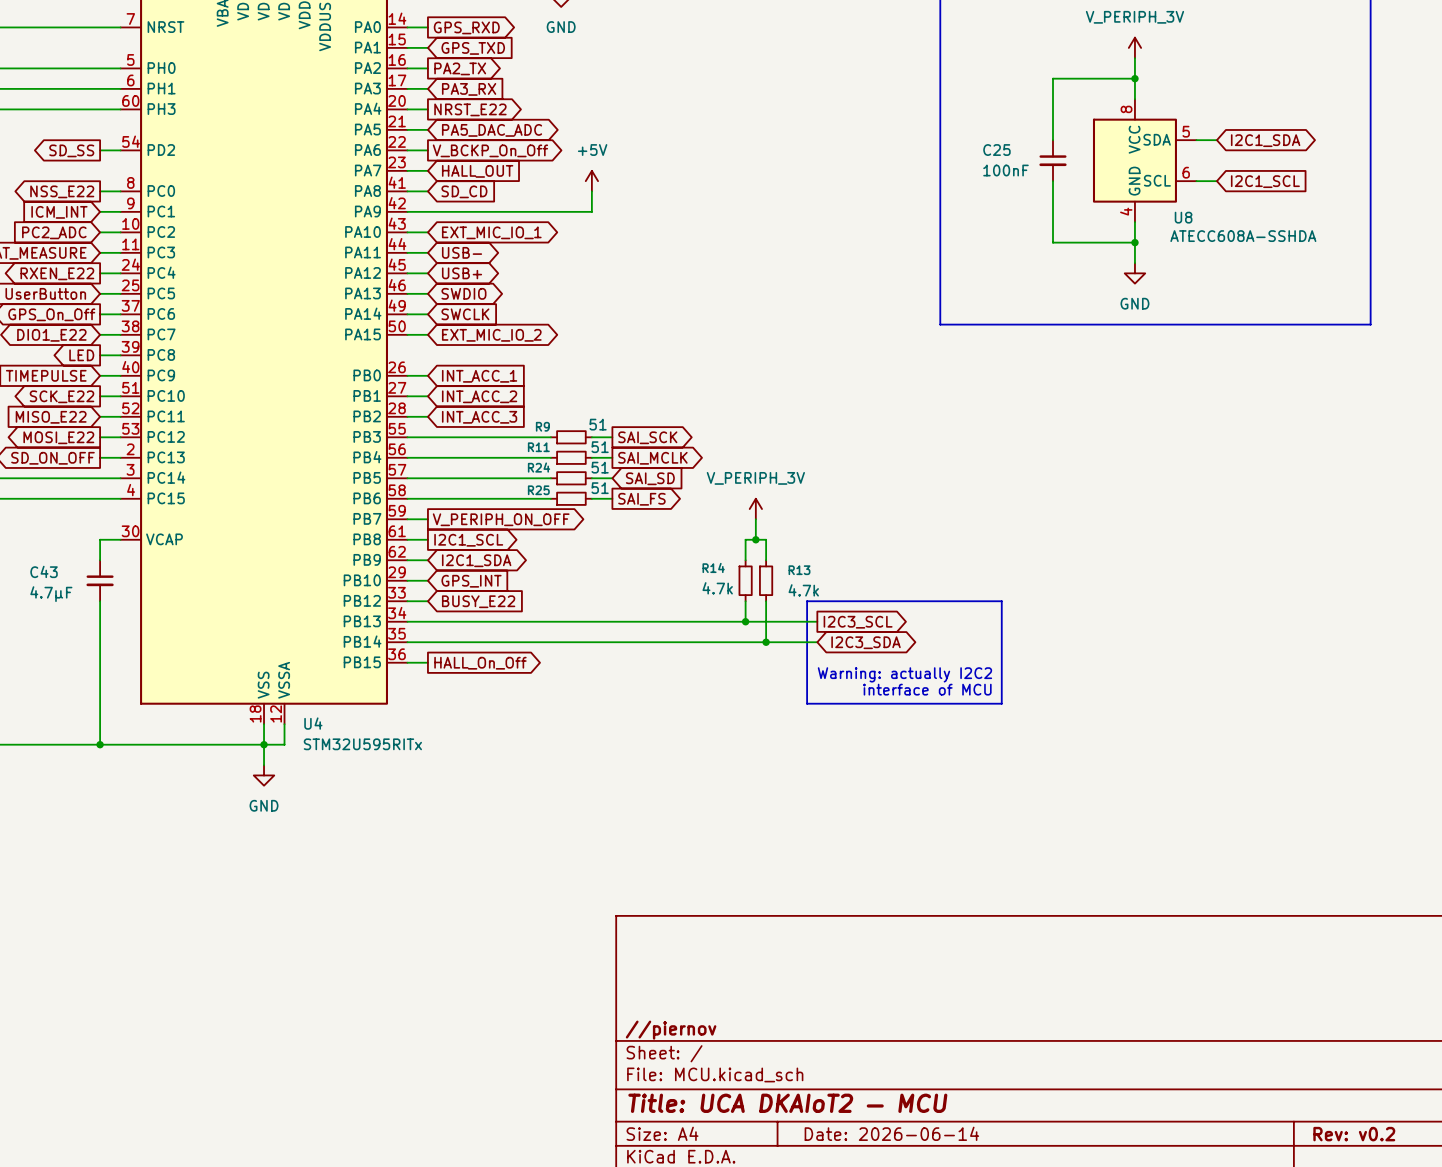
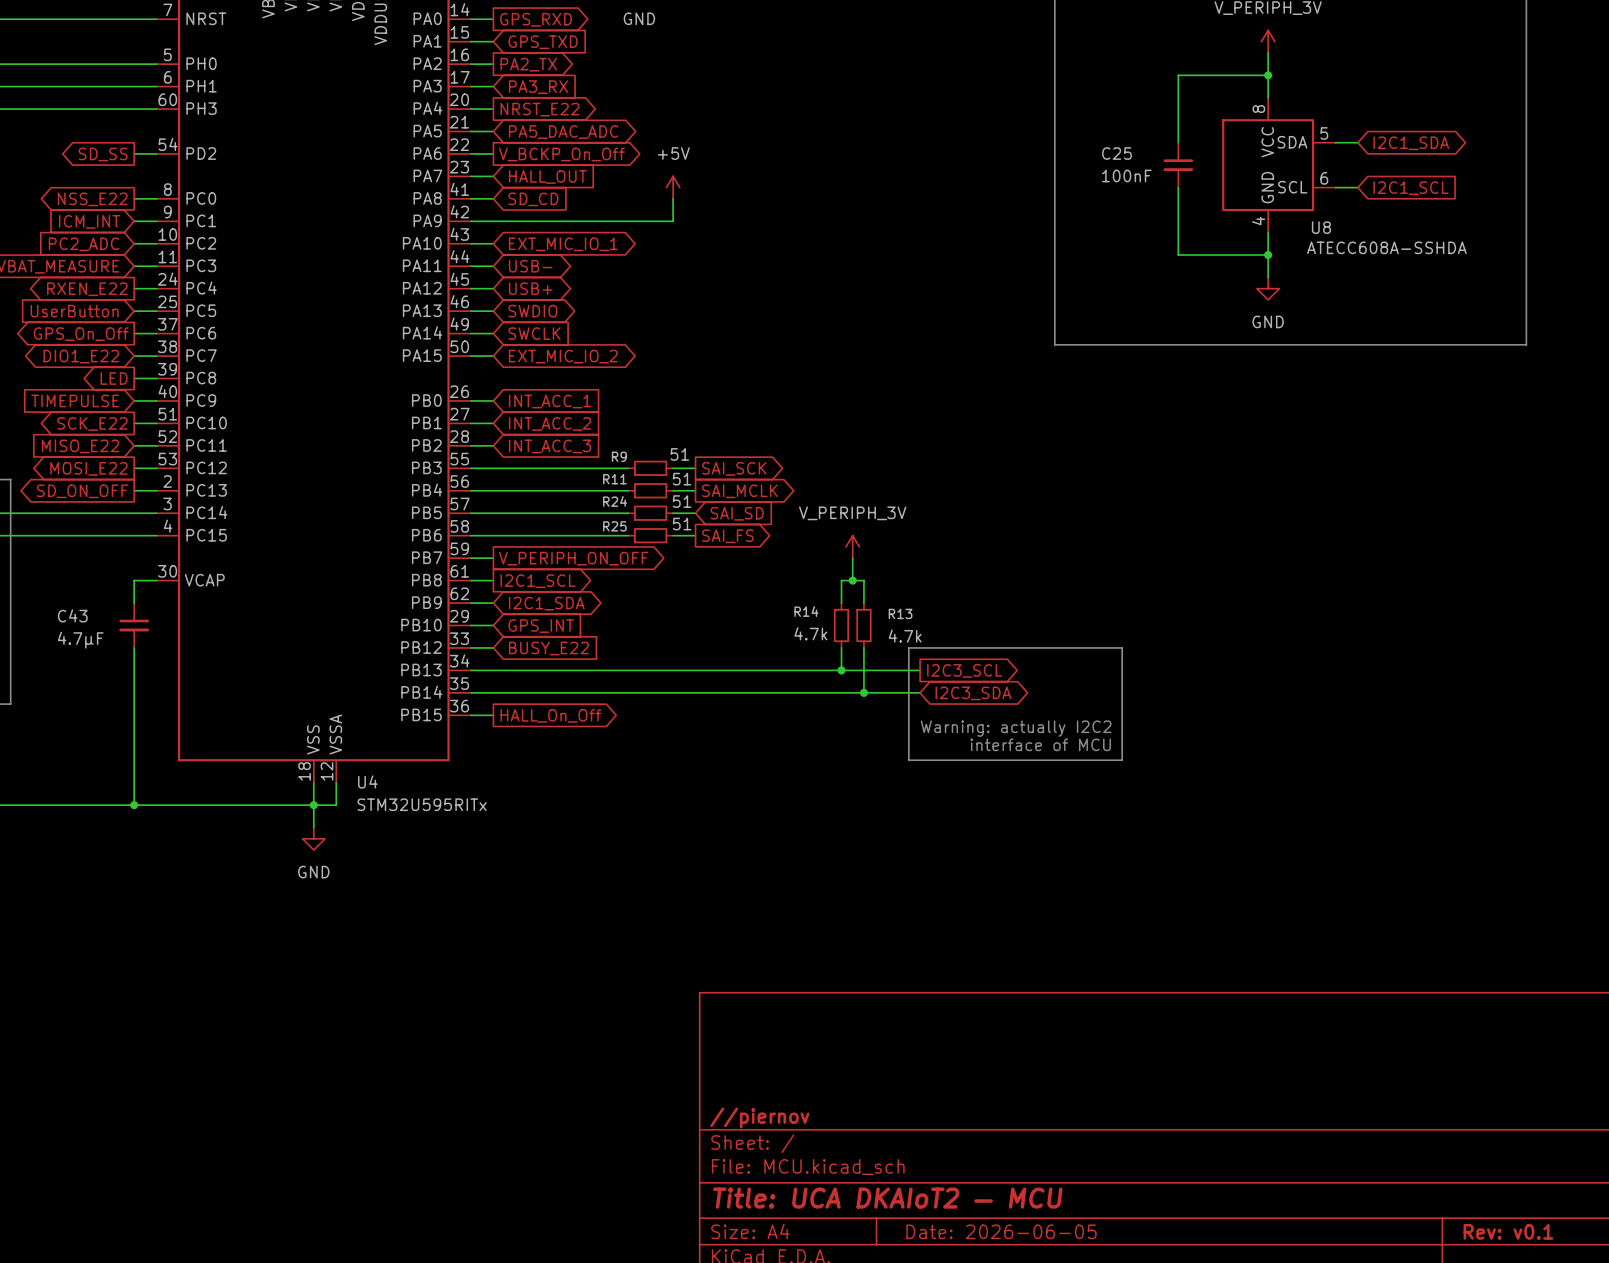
title block: Date: 2026-06-14 (891, 1133) -> Date: 2026-06-05 (1001, 1231)
title block: Rev: v0.2 (1354, 1134) -> Rev: v0.1 (1508, 1231)

